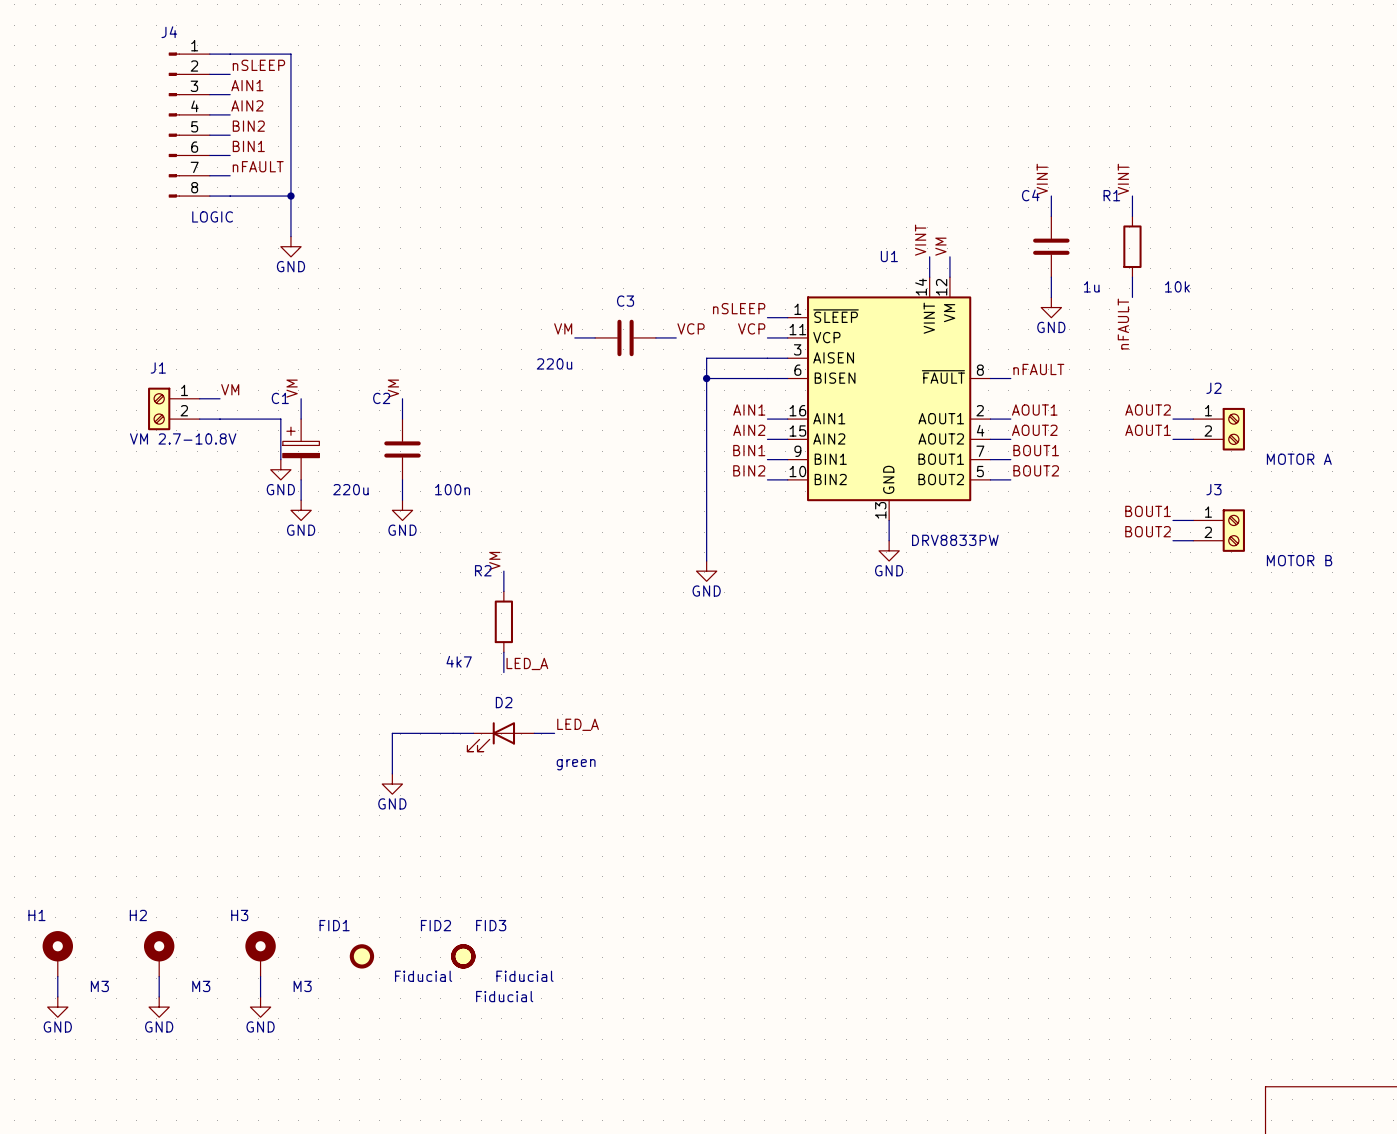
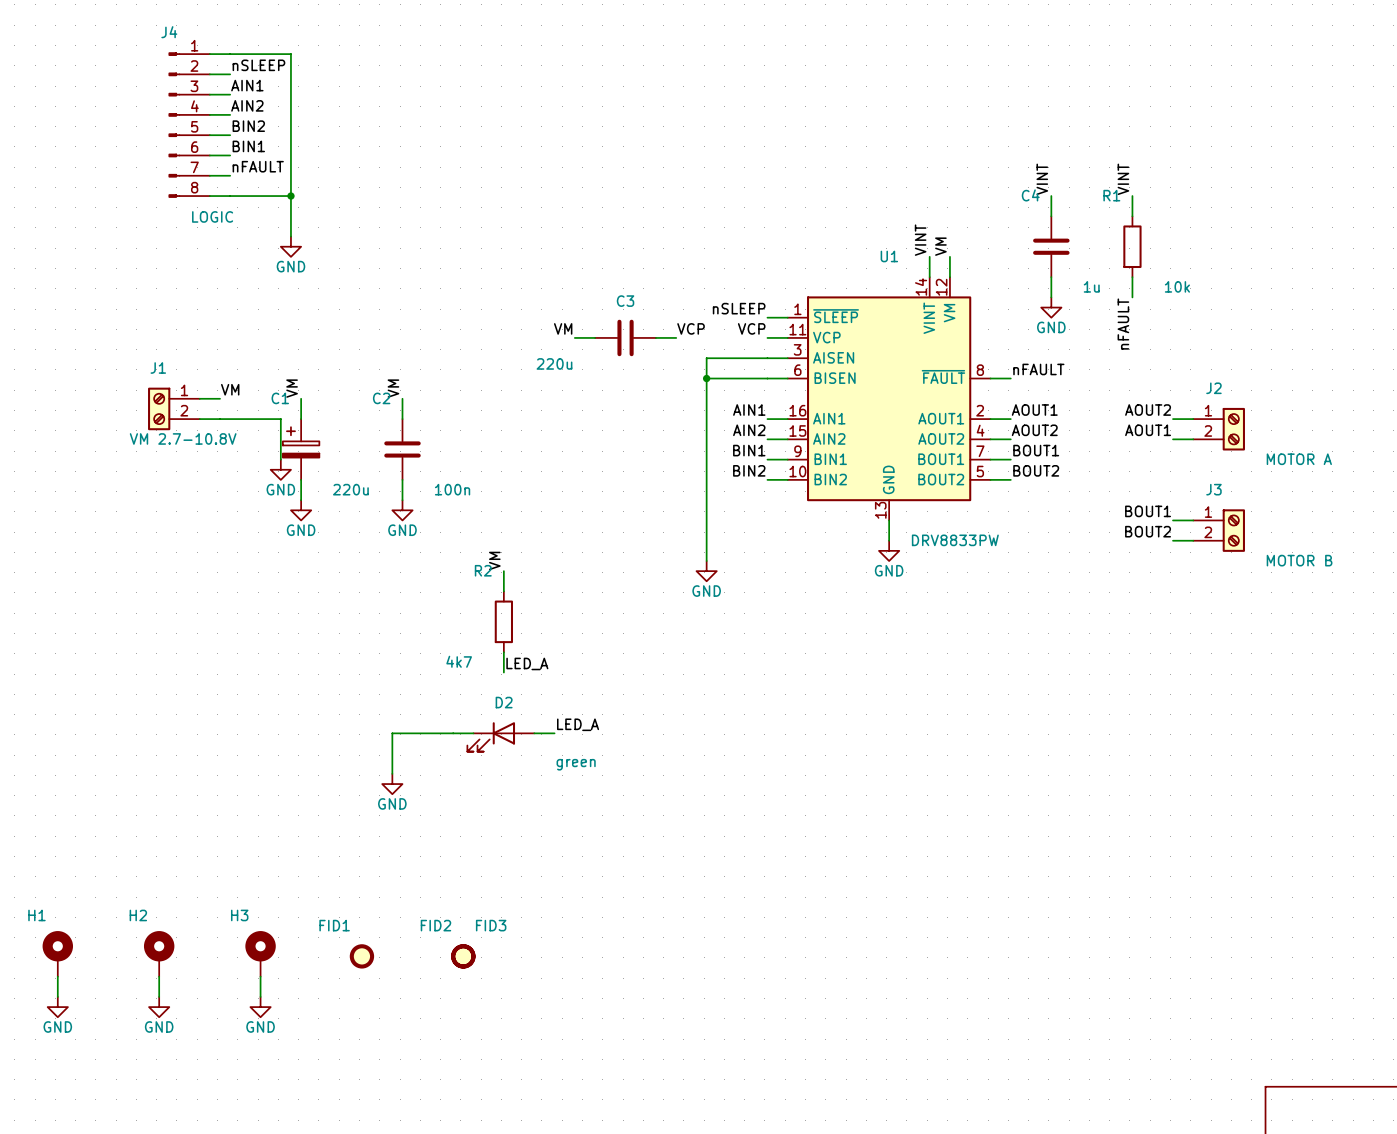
FID1 value: Fiducial (423, 976) -> none
FID2 value: Fiducial (524, 976) -> none
H1 value: M3 (99, 986) -> none
H2 value: M3 (201, 986) -> none
H3 value: M3 (302, 986) -> none
FID3 value: Fiducial (504, 996) -> none

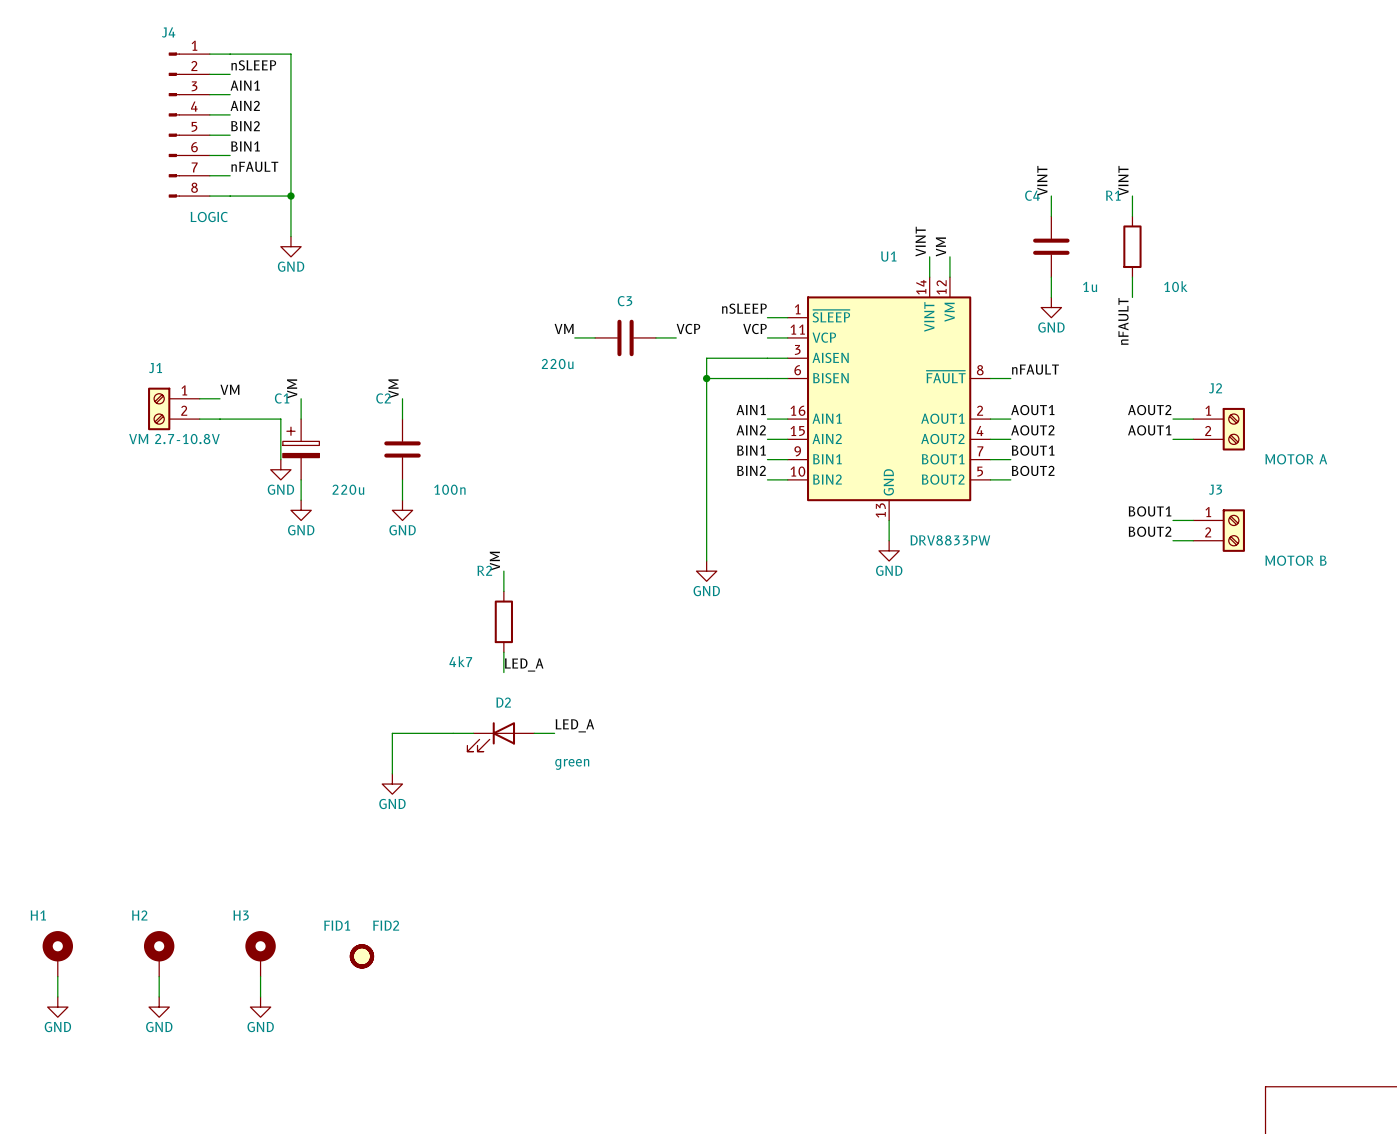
FID2 name position: FID2 (435, 925) -> FID2 (386, 925)
FID2 position: (463, 956) -> (361, 956)
FID3: (463, 956) -> none

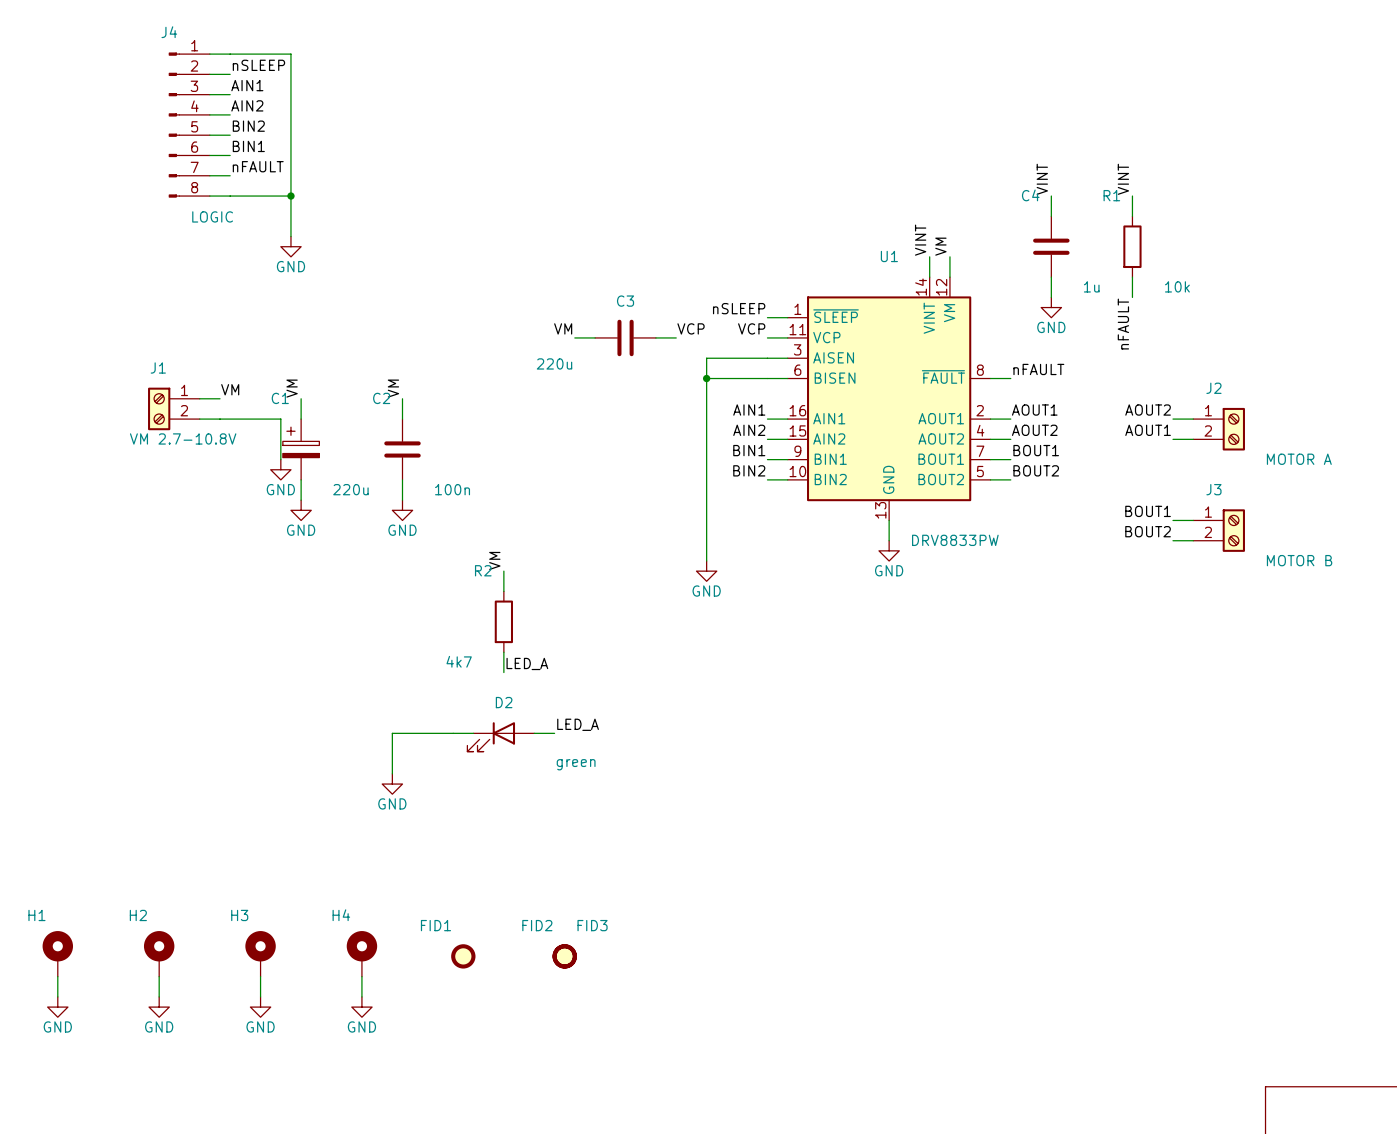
FID2 name position: FID2 (386, 925) -> FID2 (537, 925)
H4: none -> (361, 953)
FID1 position: (361, 956) -> (463, 956)
FID2 position: (361, 956) -> (564, 956)
FID3: none -> (564, 956)
wire: none -> (361, 976) (361, 996)
power symbol: none -> GND (361, 1007)

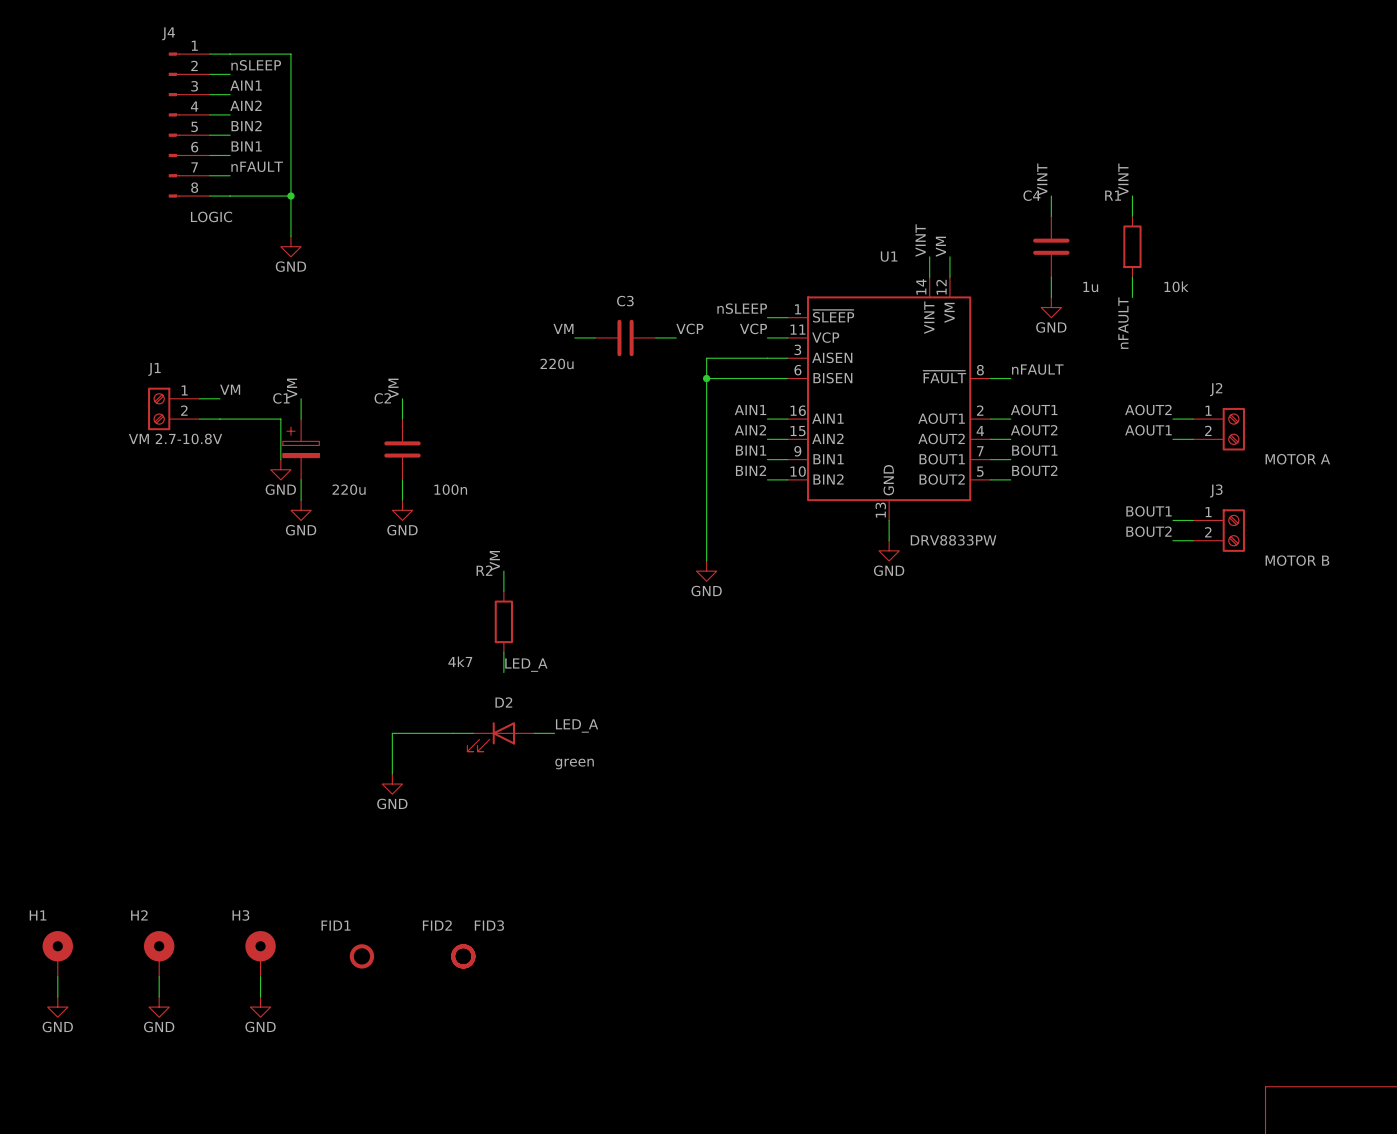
H4: (361, 953) -> none
FID1 position: (463, 956) -> (361, 956)
FID2 position: (564, 956) -> (463, 956)
FID3 position: (564, 956) -> (463, 956)
wire: (361, 976) (361, 996) -> none
power symbol: GND (361, 1007) -> none

